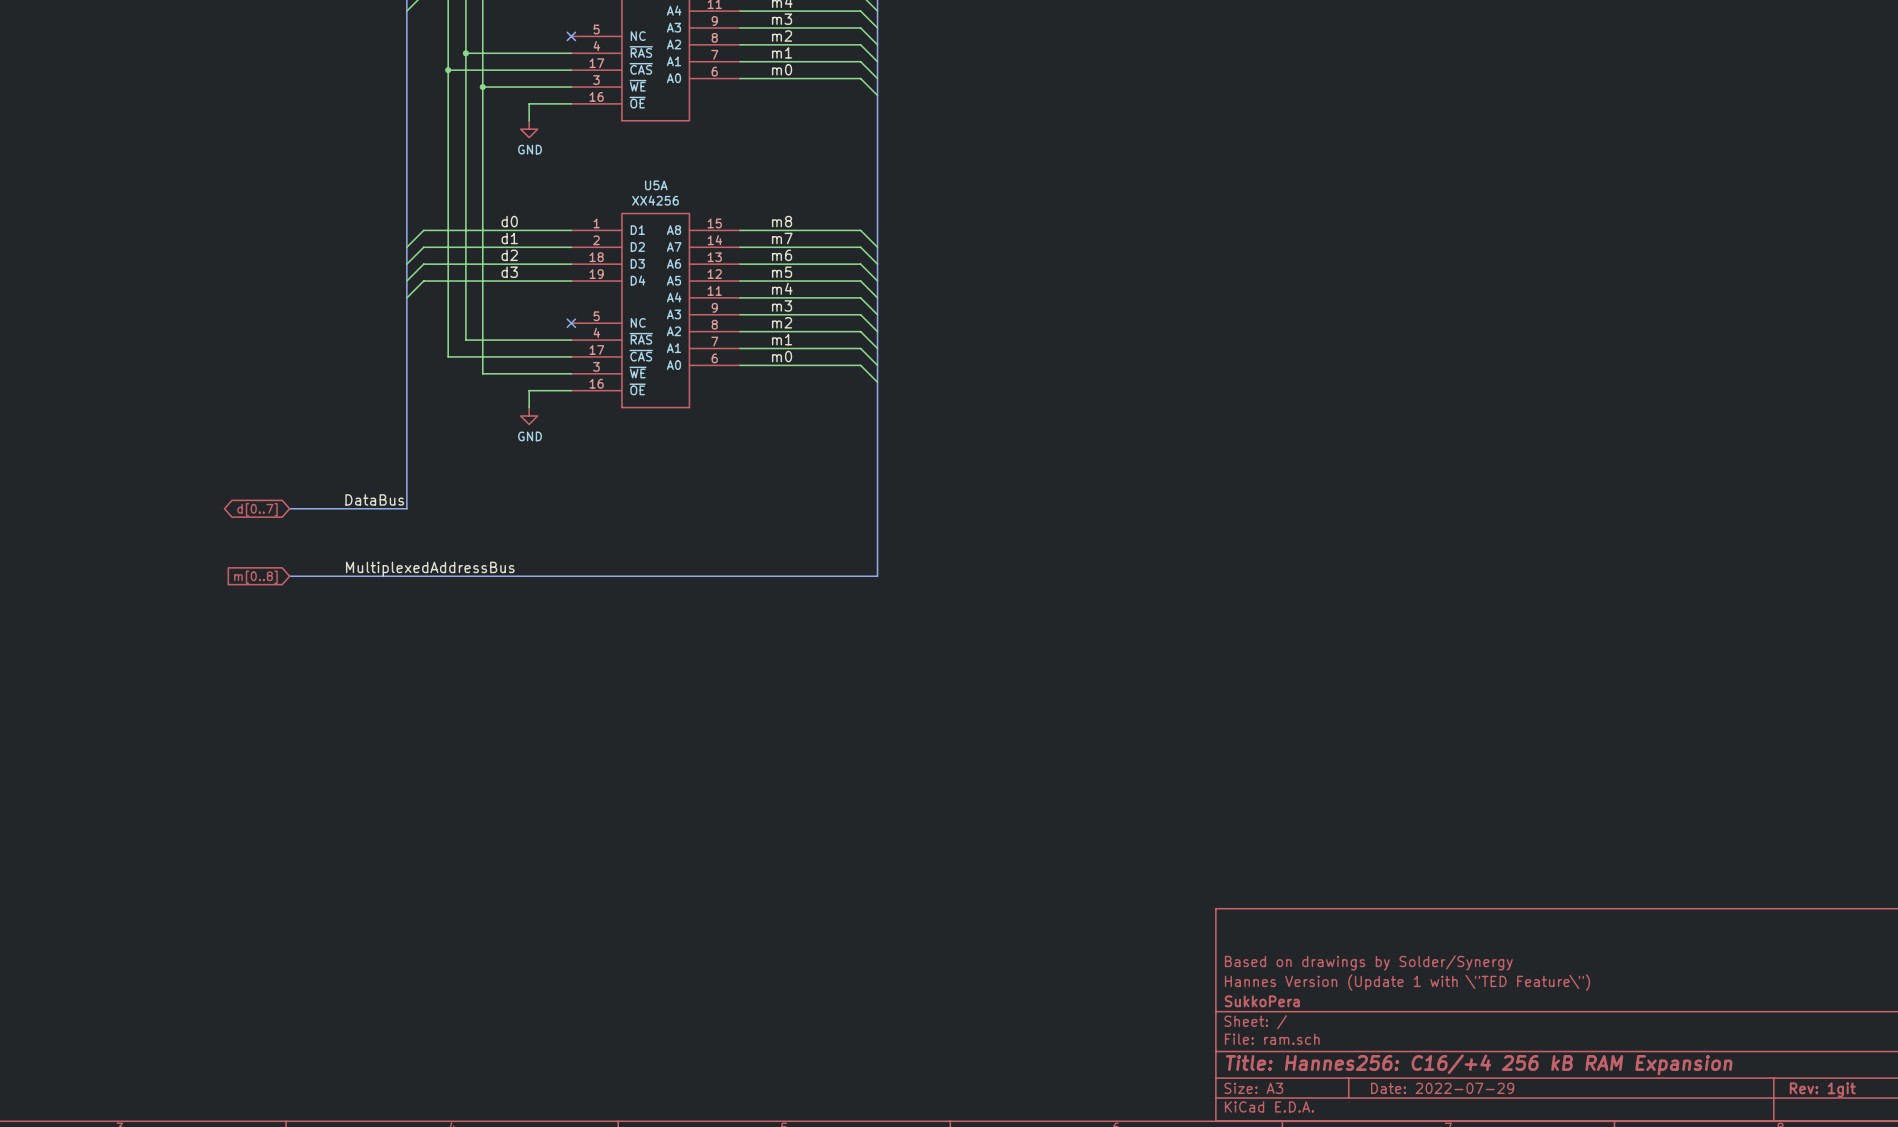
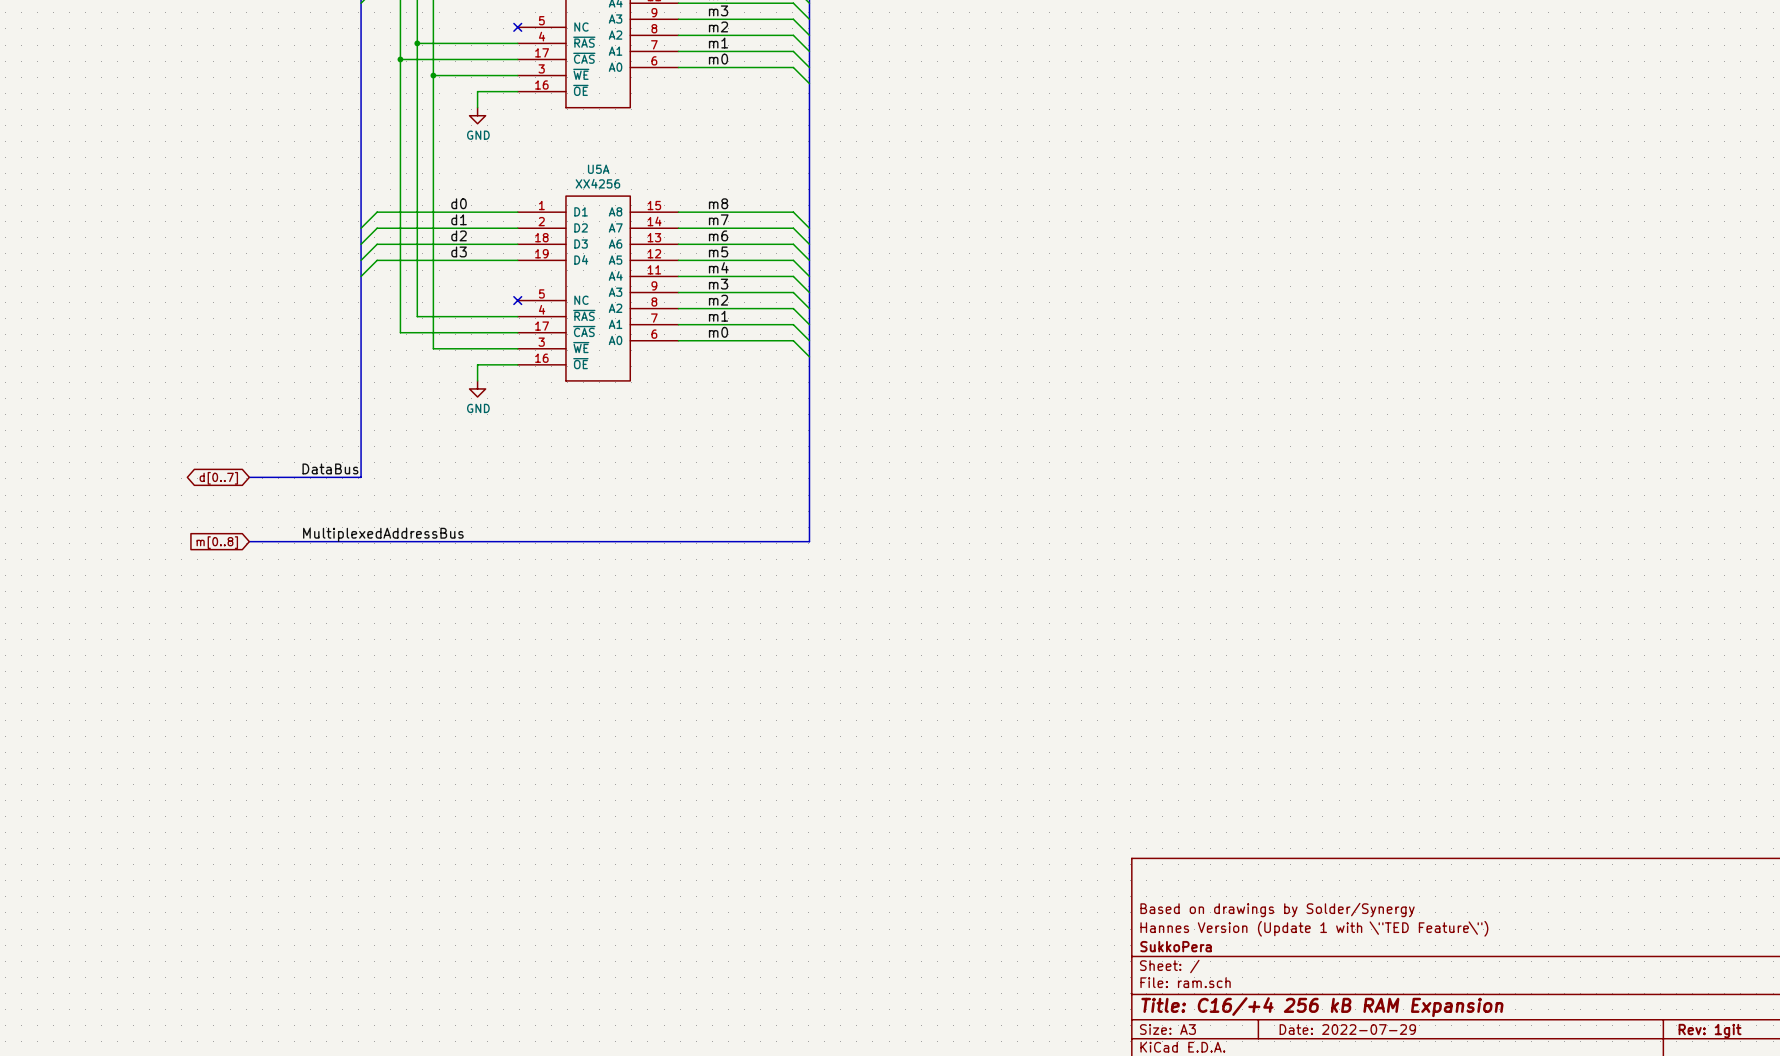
title block: Title: Hannes256: C16/+4 256 kB RAM Expansion (1479, 1064) -> Title: C16/+4 256 kB RAM Expansion (1322, 1007)

